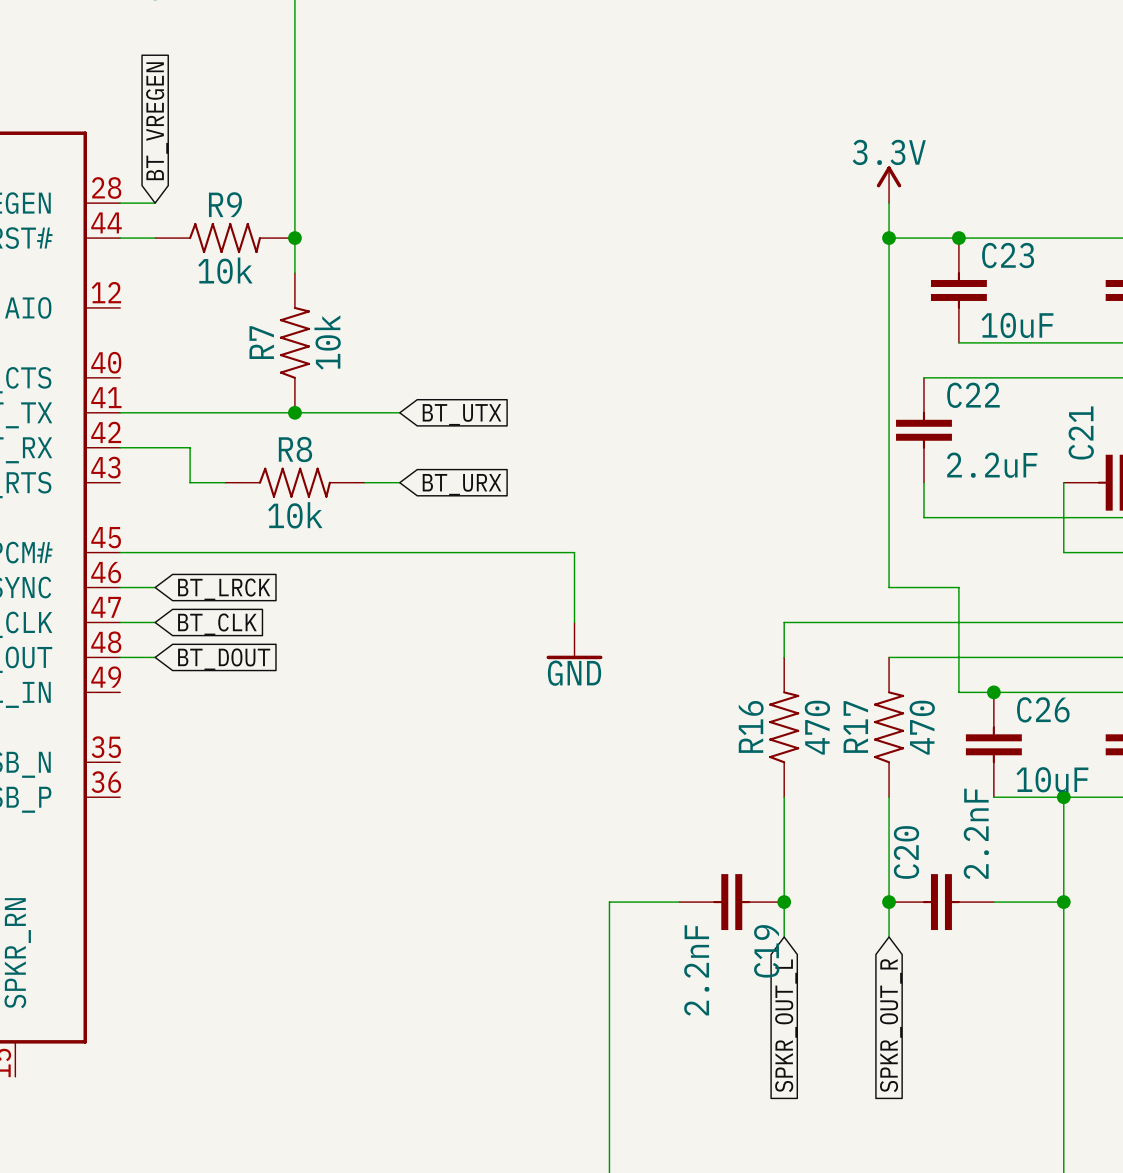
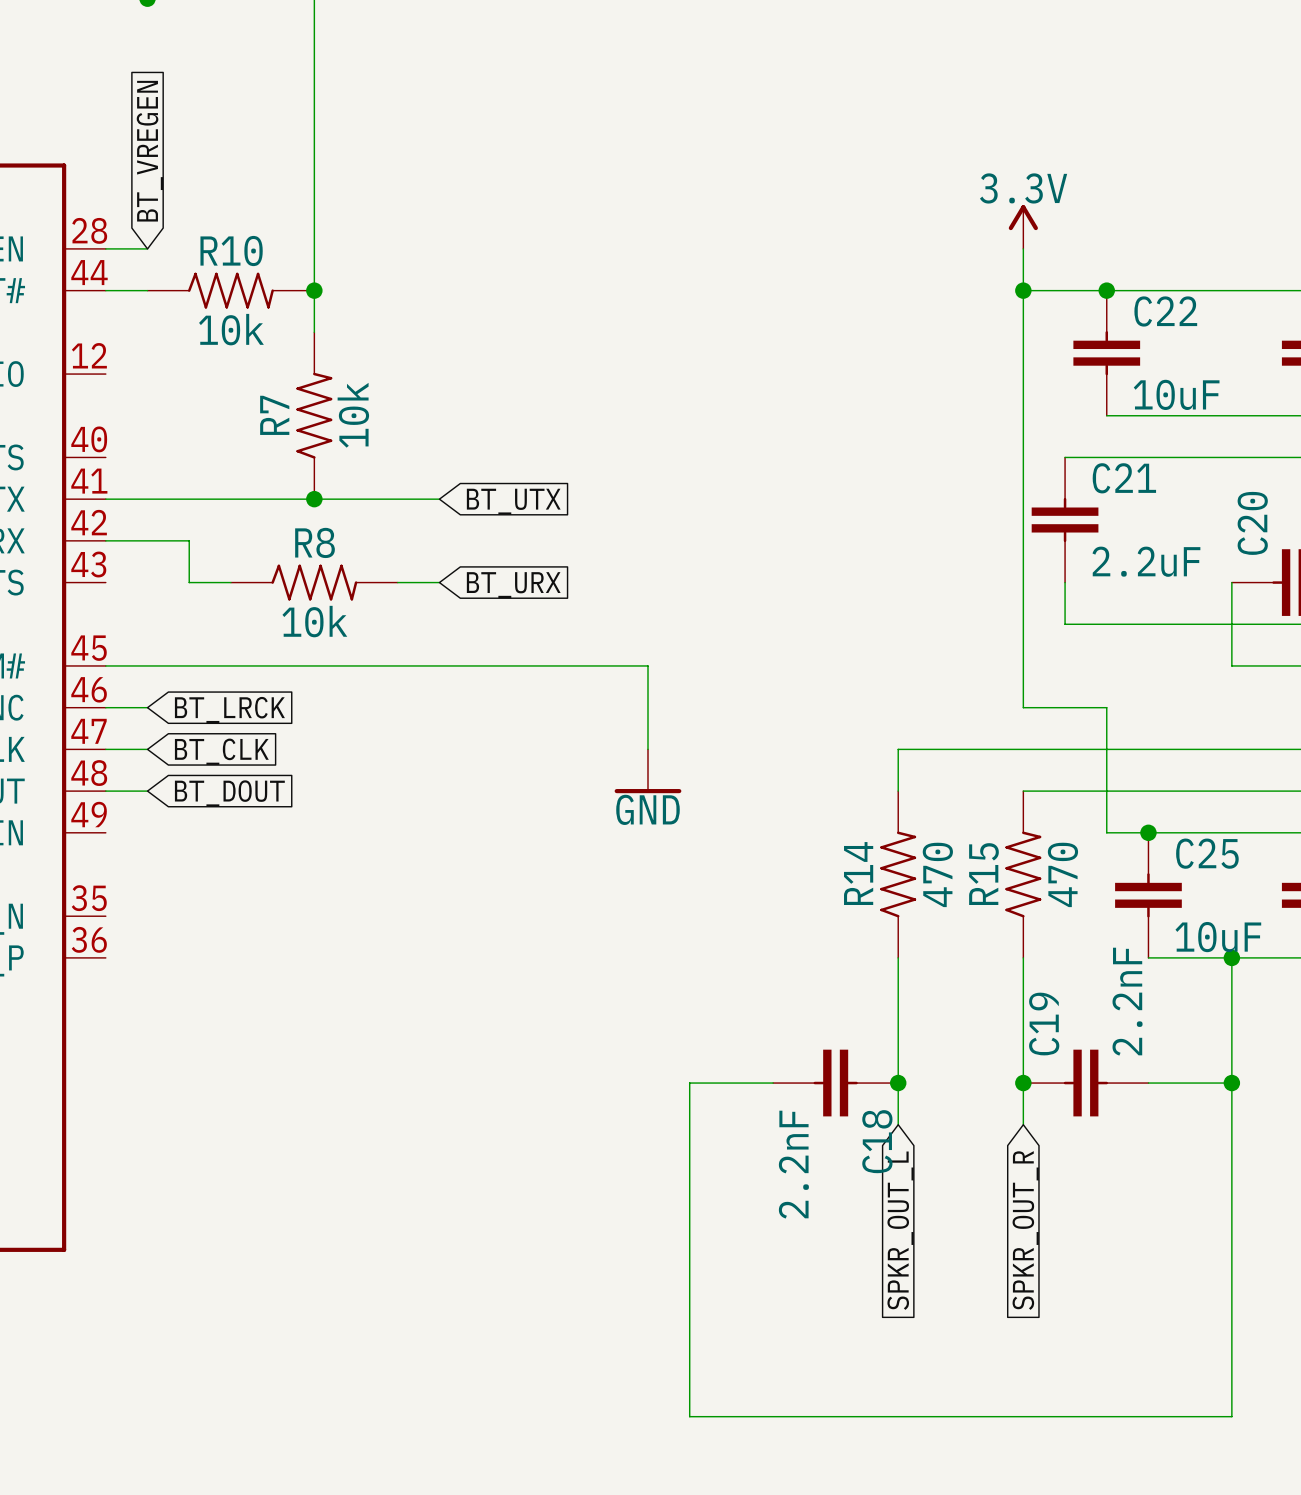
R9 name: R9 (225, 204) -> R10 (231, 251)
C23 name: C23 (1008, 255) -> C22 (1165, 311)
C22 name: C22 (973, 395) -> C21 (1124, 478)
C21 name: C21 (1081, 432) -> C20 (1252, 523)
C26 name: C26 (1043, 709) -> C25 (1207, 853)
R16 name: R16 (751, 726) -> R14 (858, 873)
R17 name: R17 (855, 727) -> R15 (983, 874)
C20 name: C20 (906, 852) -> C19 (1044, 1024)
C19 name: C19 (766, 951) -> C18 (877, 1141)

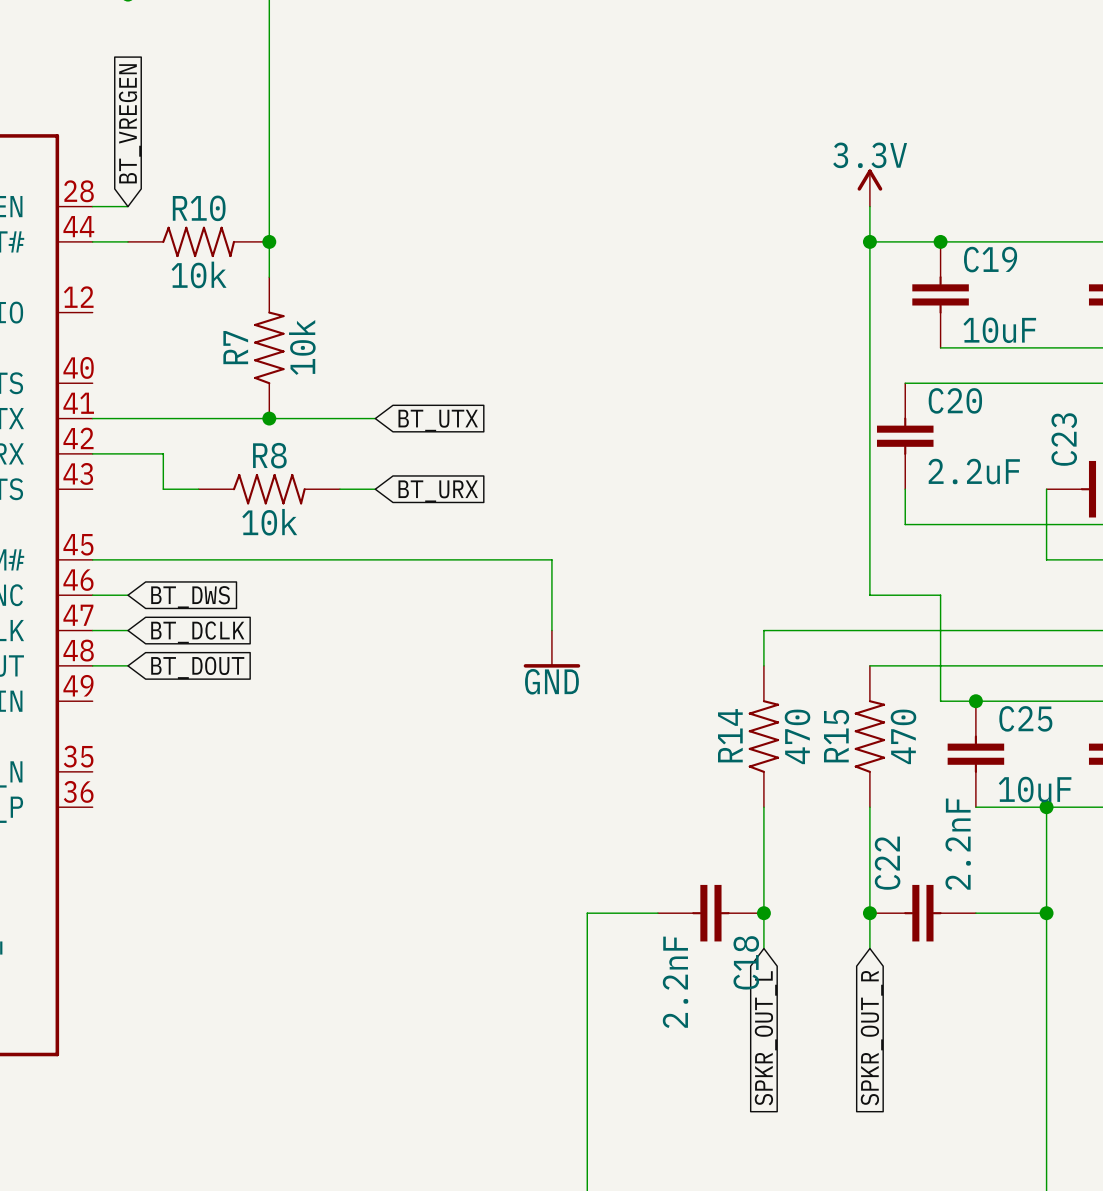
C22 name: C22 (1165, 311) -> C19 (990, 259)
C21 name: C21 (1124, 478) -> C20 (955, 400)
C20 name: C20 (1252, 523) -> C23 (1064, 439)
global label: BT_LRCK (229, 710) -> BT_DWS (190, 597)
global label: BT_CLK (221, 751) -> BT_DCLK (197, 632)
C19 name: C19 (1044, 1024) -> C22 (887, 863)

